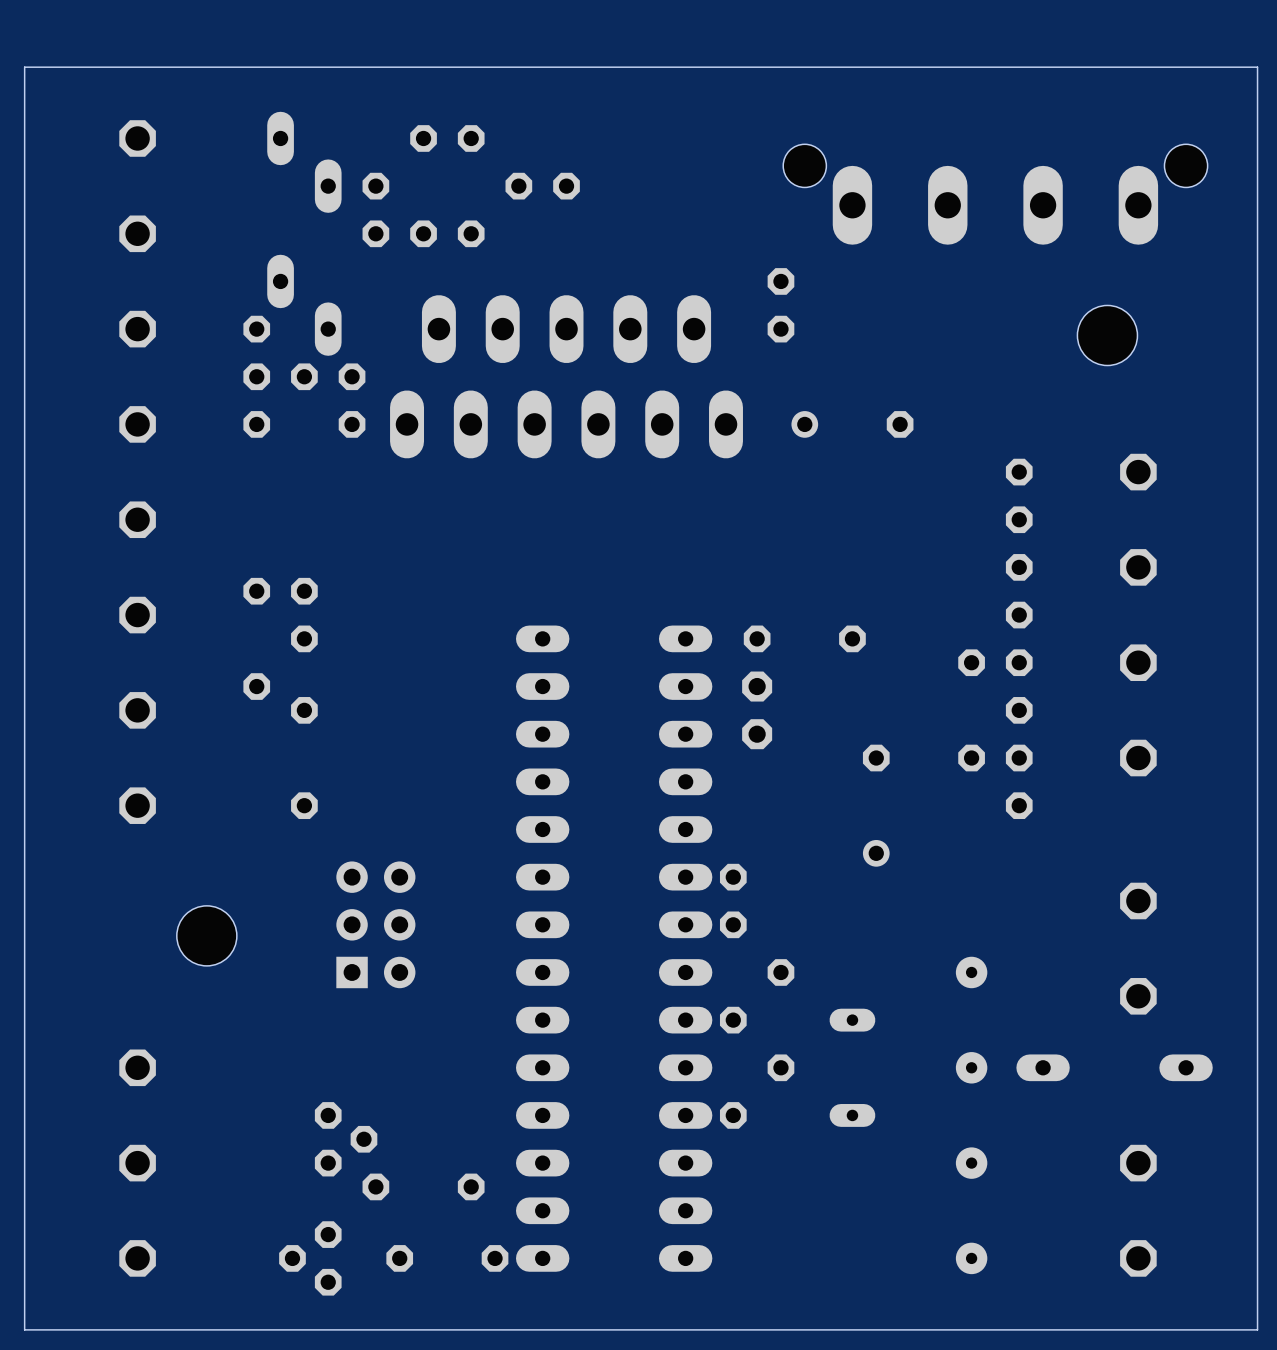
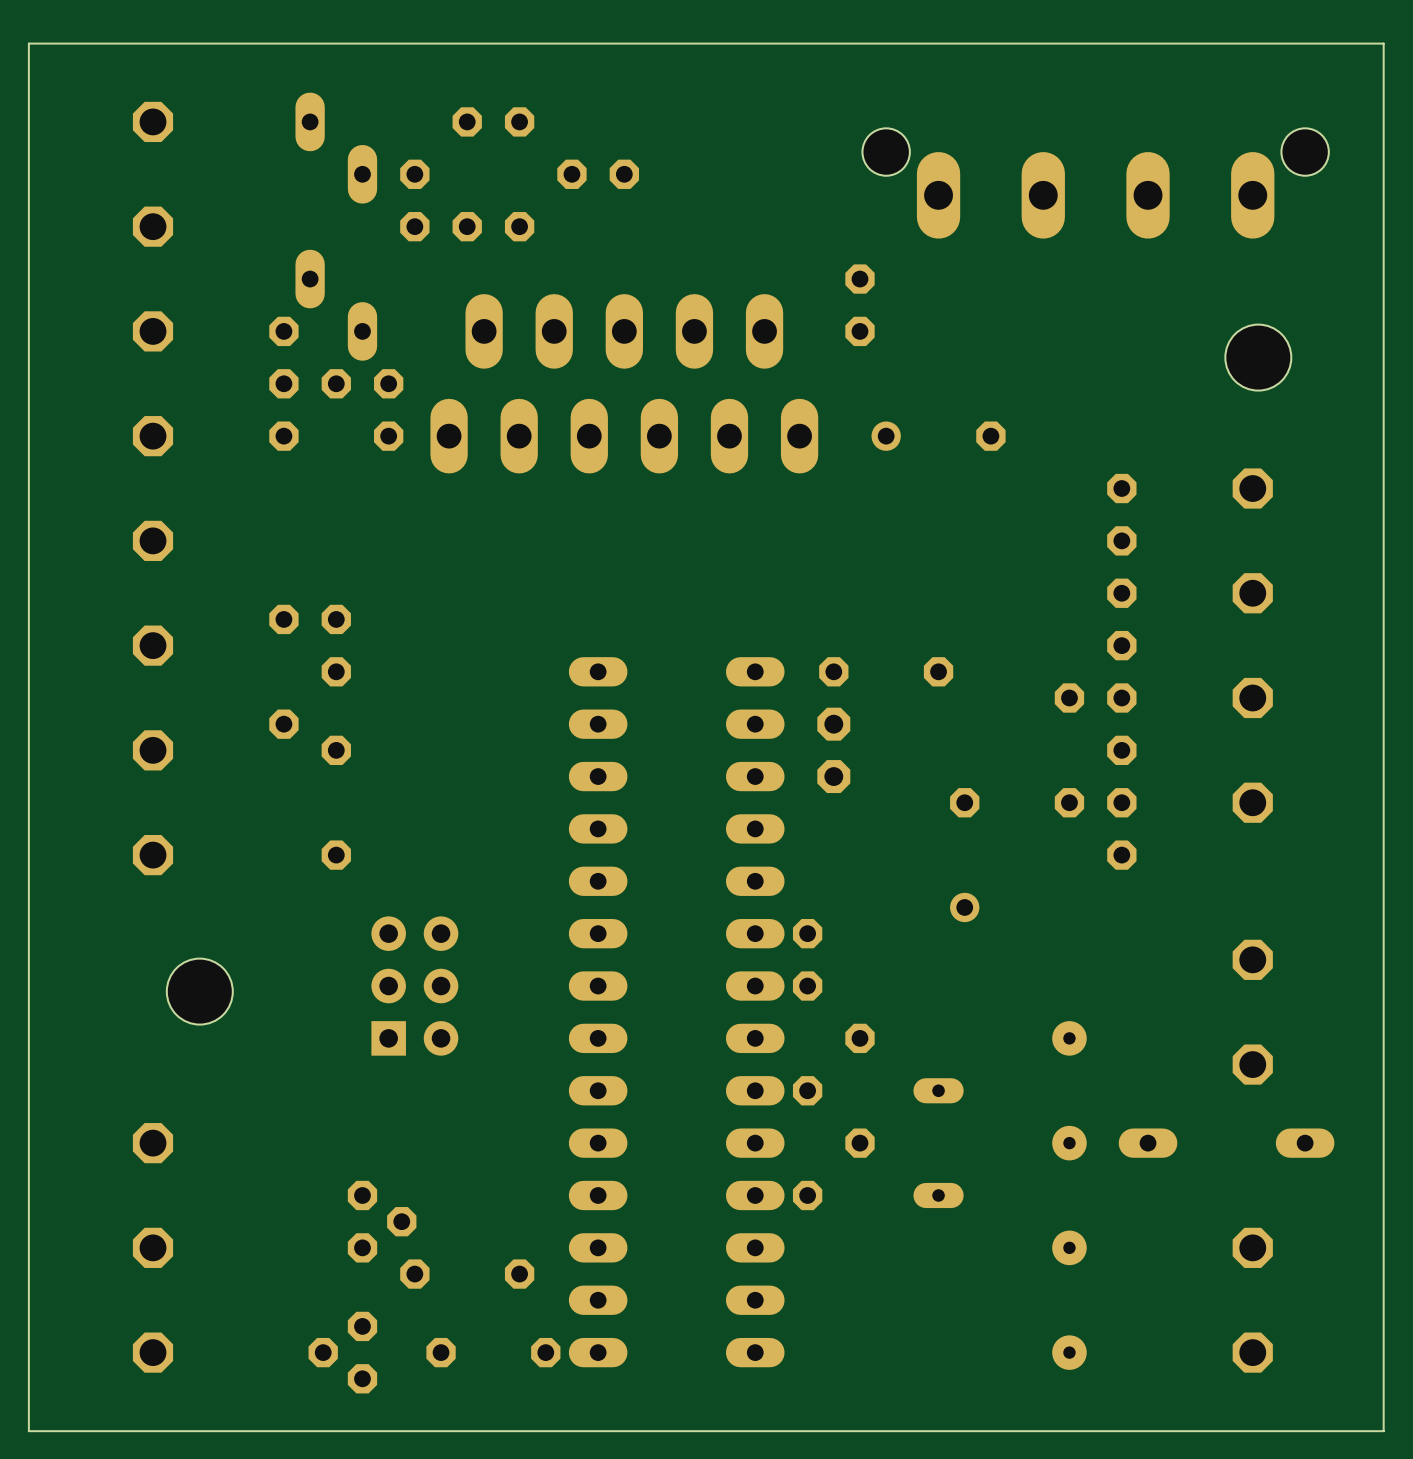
part: (1107, 335) -> none
hole: none -> (1258, 357)
hole: none -> (199, 991)
part: (206, 935) -> none

